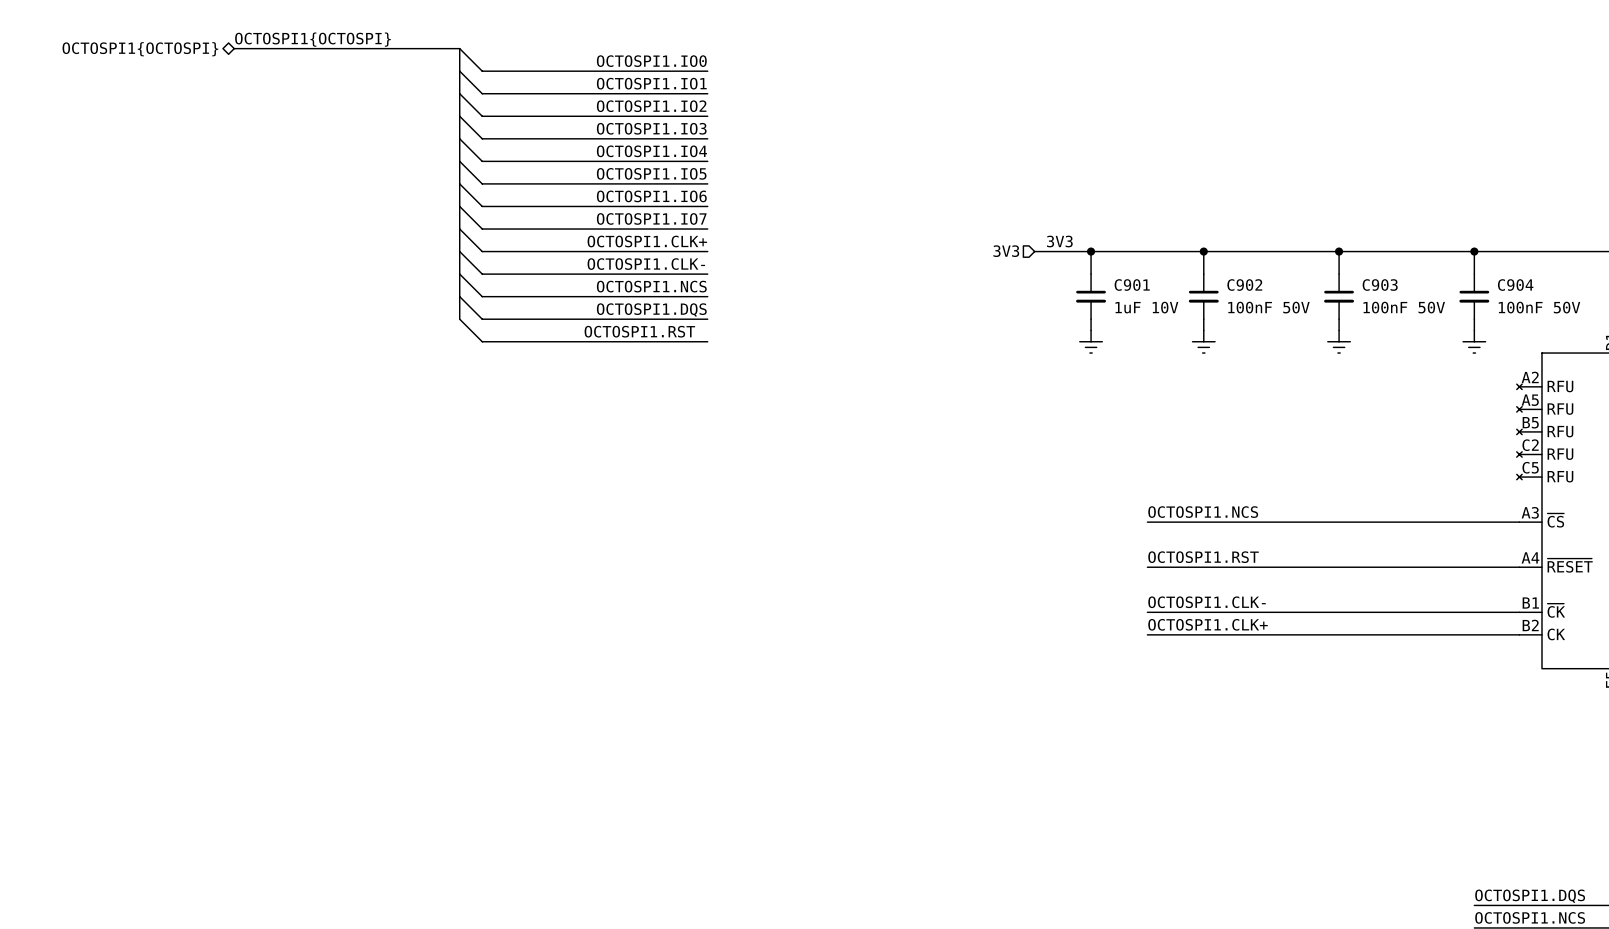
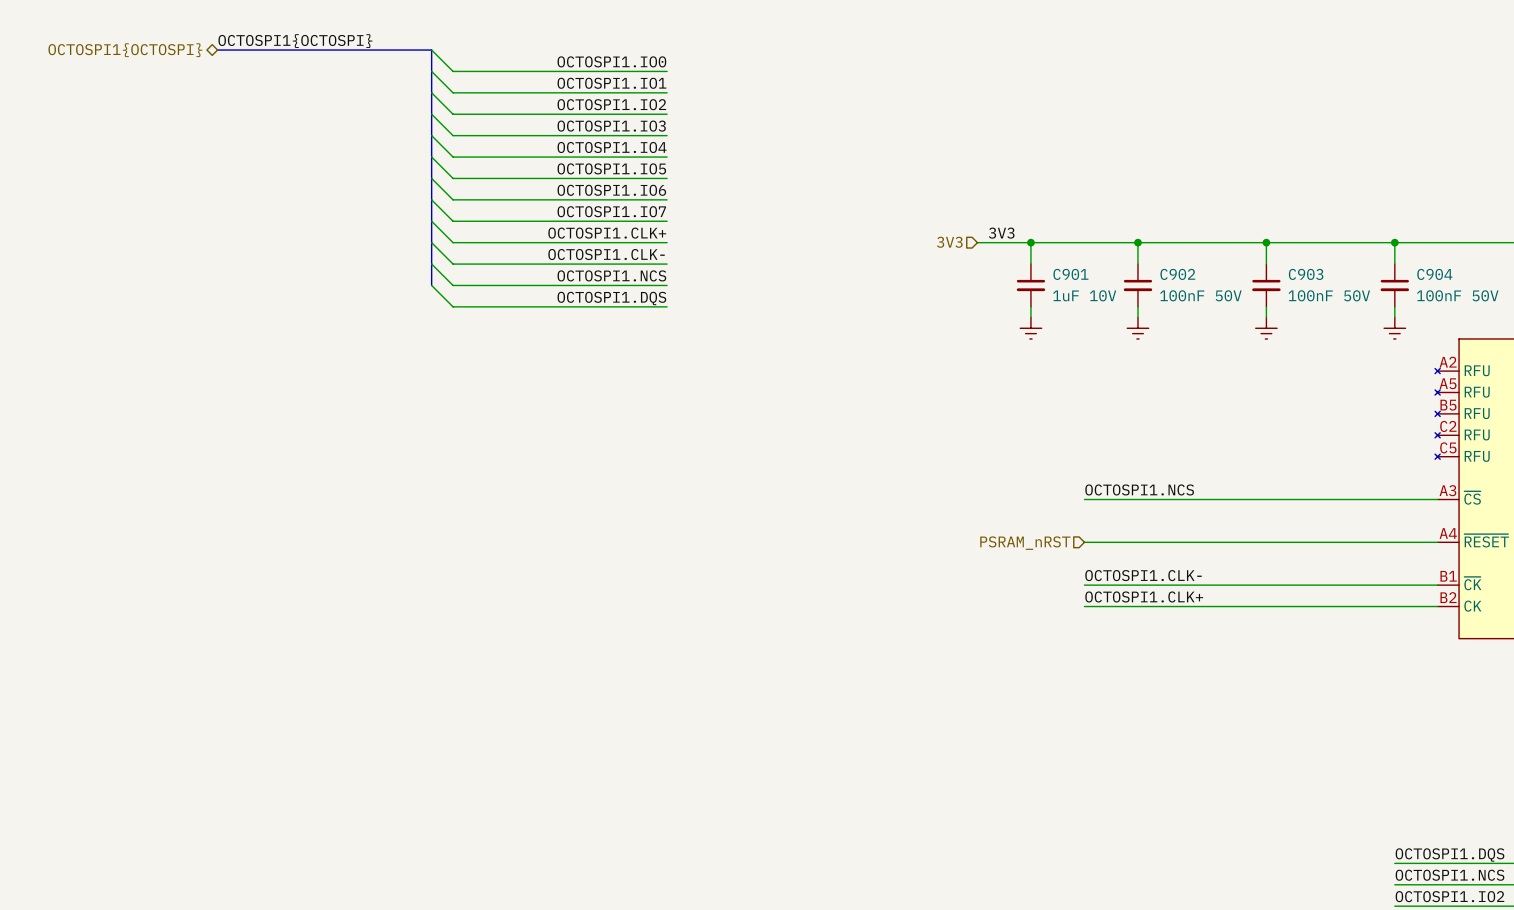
bus: (459, 296) (459, 319) -> none
wire: (459, 319) (482, 341) (707, 341) -> none
label: OCTOSPI1.RST (639, 331) -> none
label: OCTOSPI1.RST (1203, 557) -> none
hierarchical label: none -> PSRAM_nRST (1025, 543)

